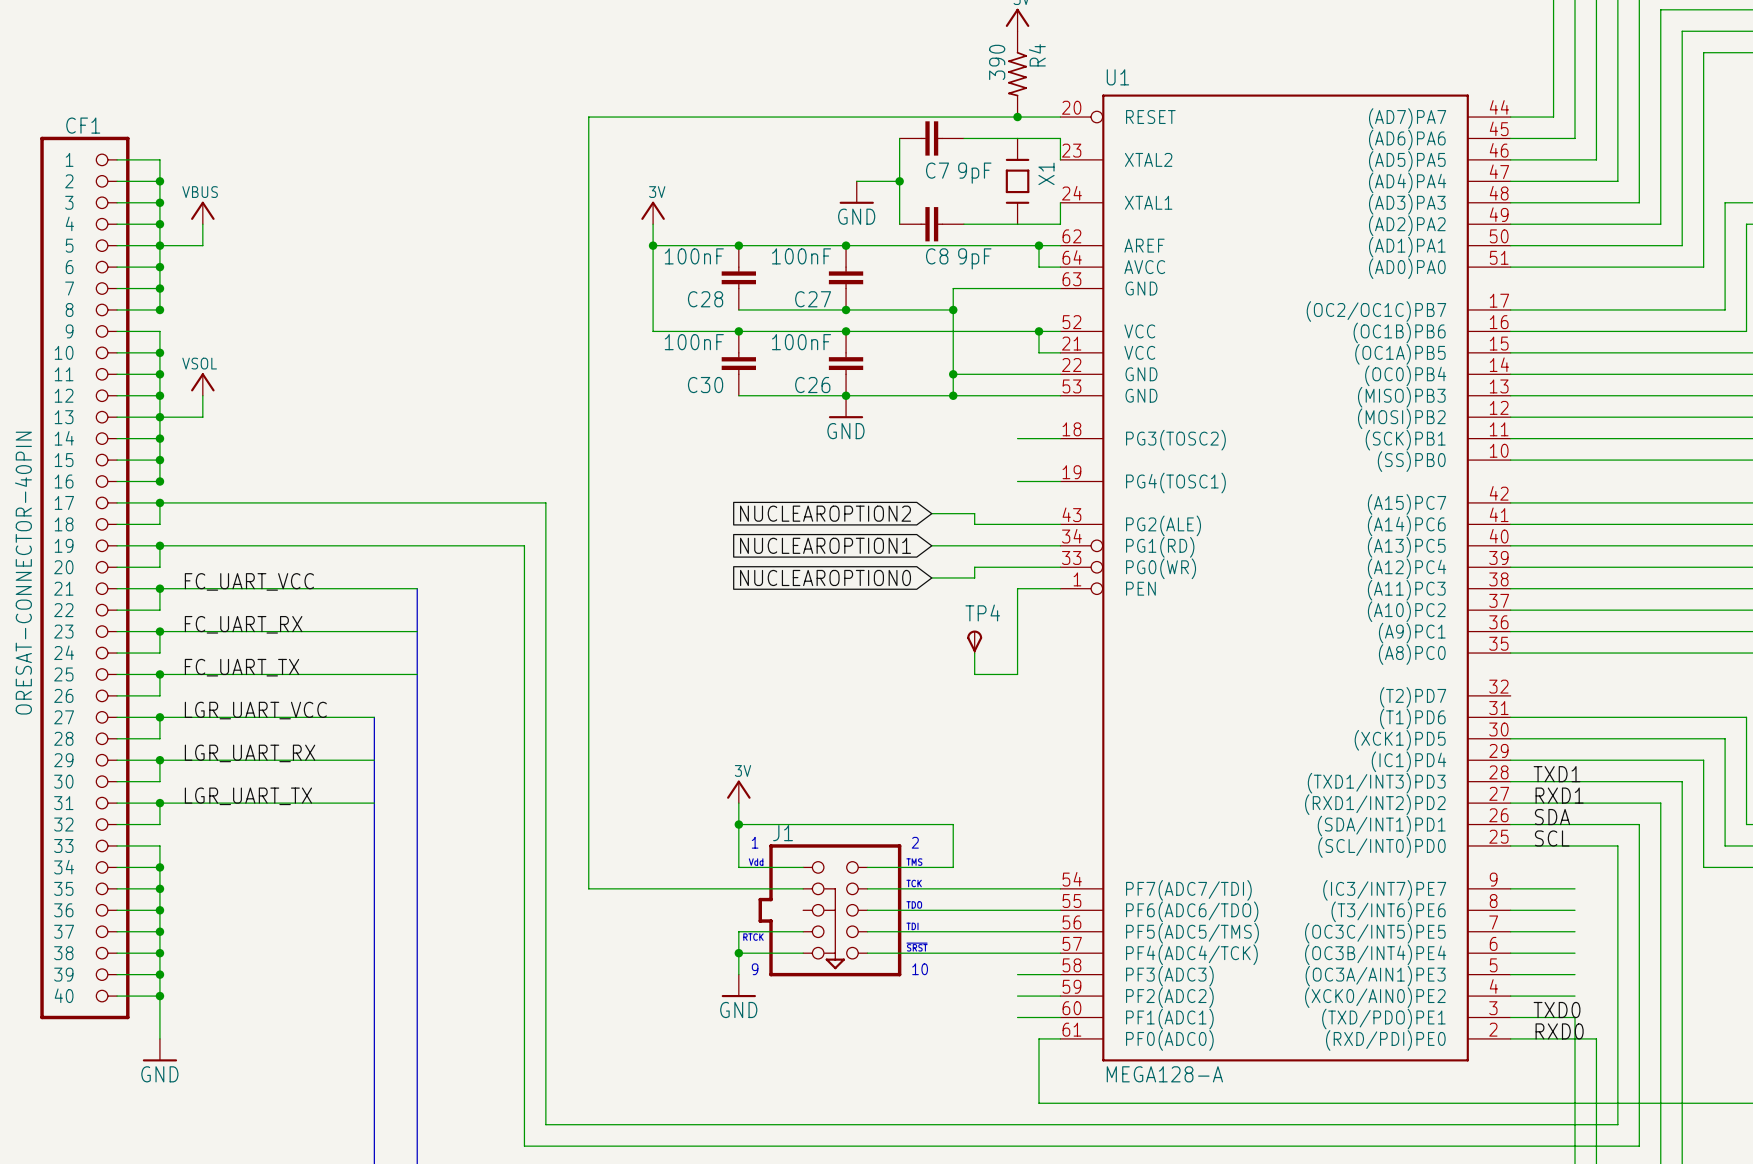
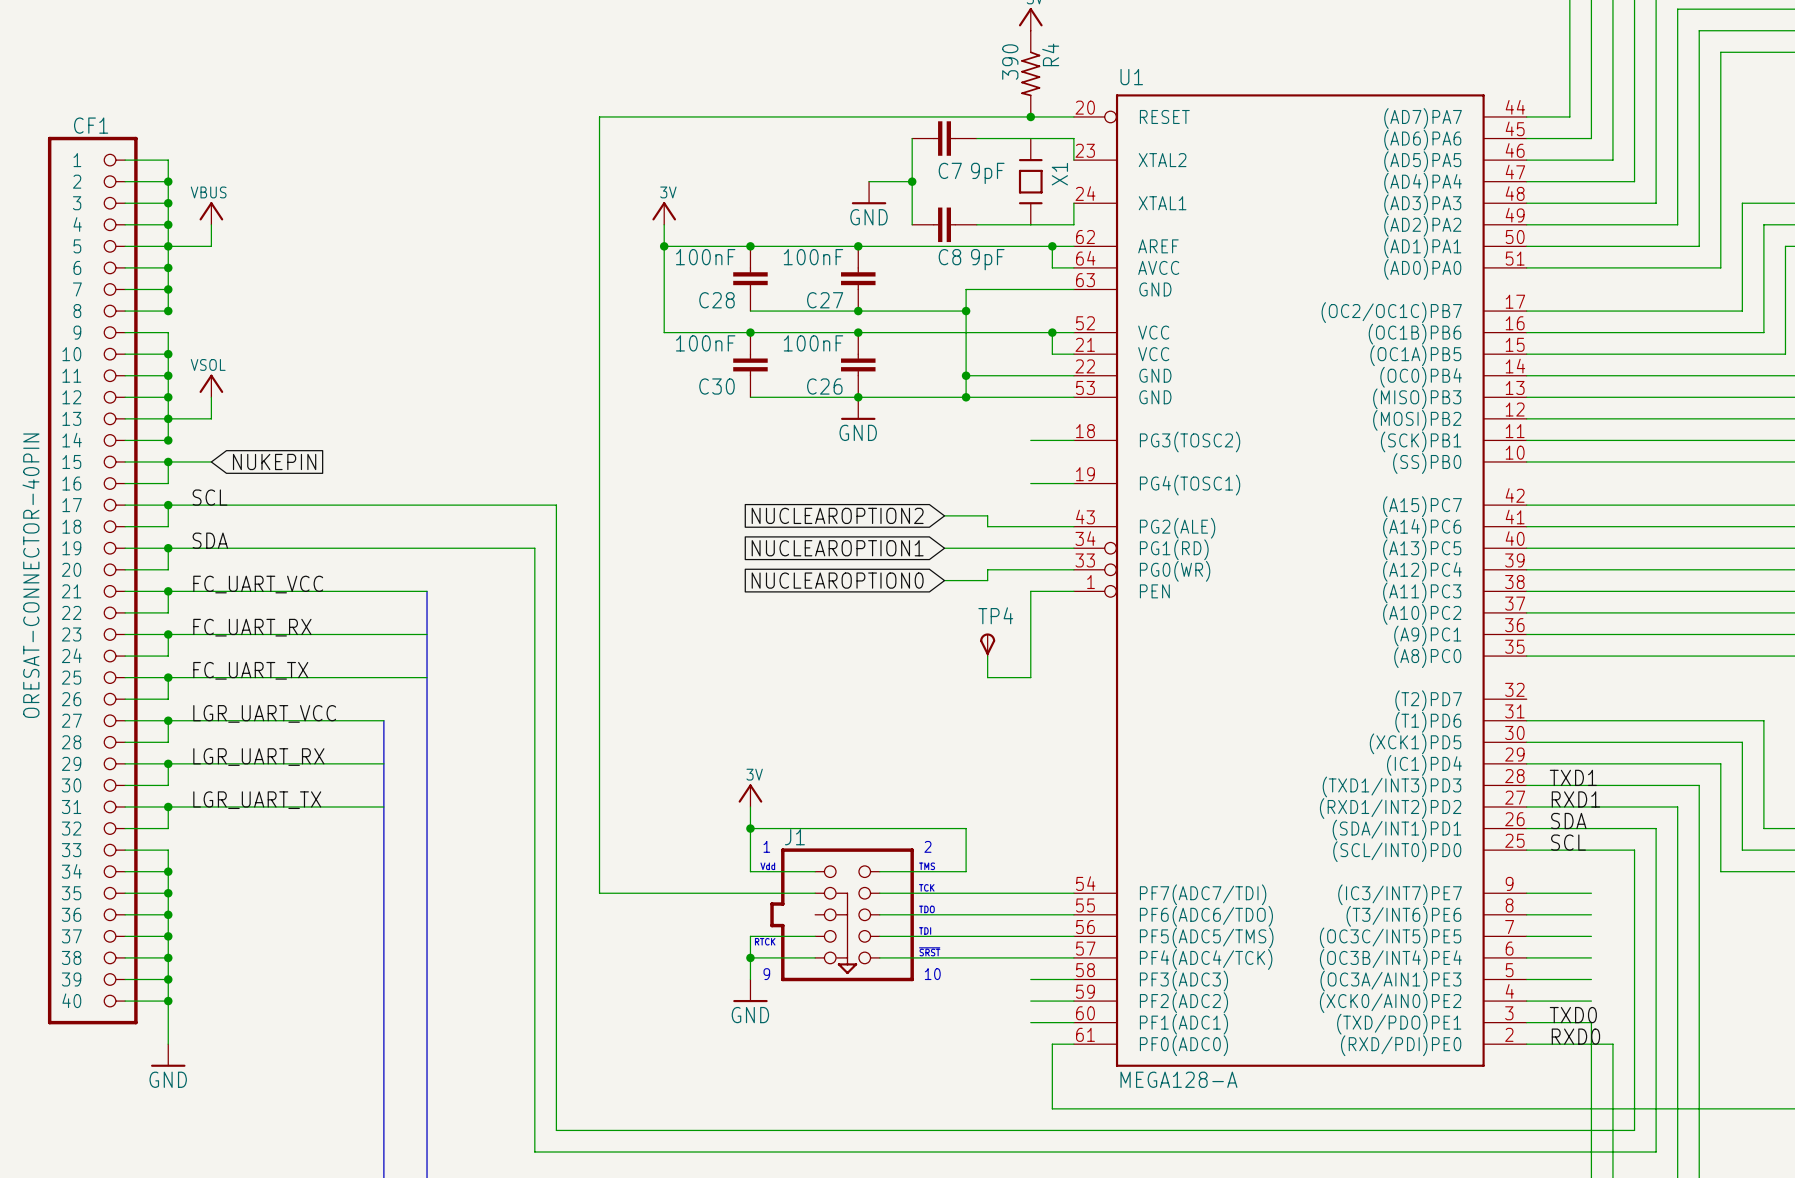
wire: (159, 438) (159, 460) -> (211, 461) (168, 461)
global label: none -> NUKEPIN (274, 461)
junction: (159, 481) -> none
label: none -> SCL (210, 497)
label: none -> SDA (210, 540)

